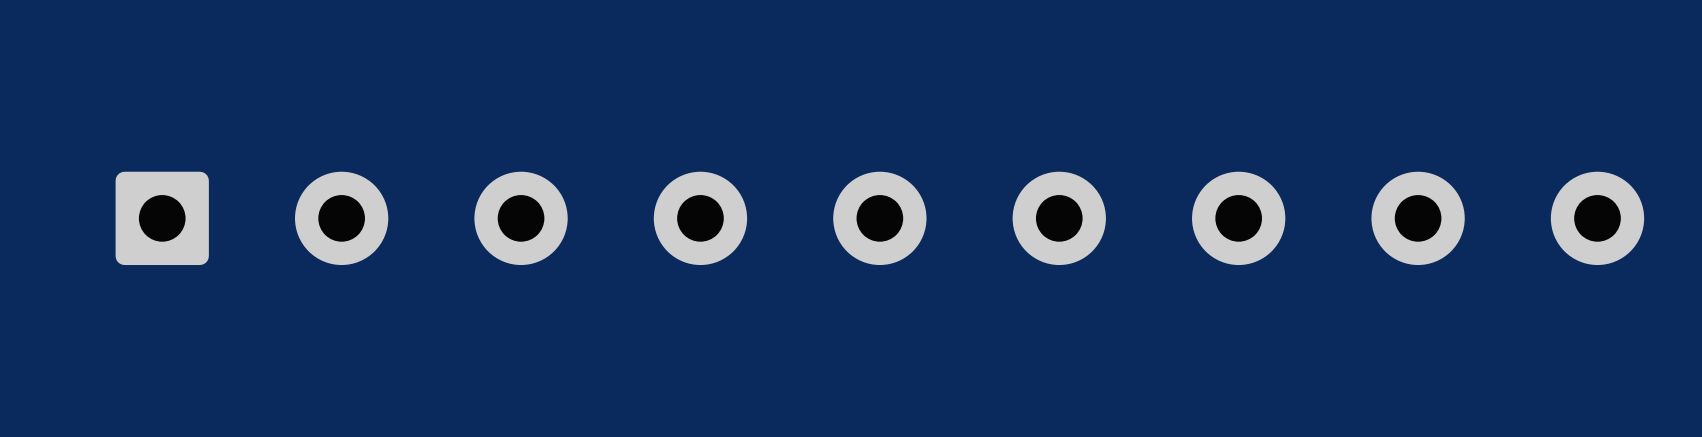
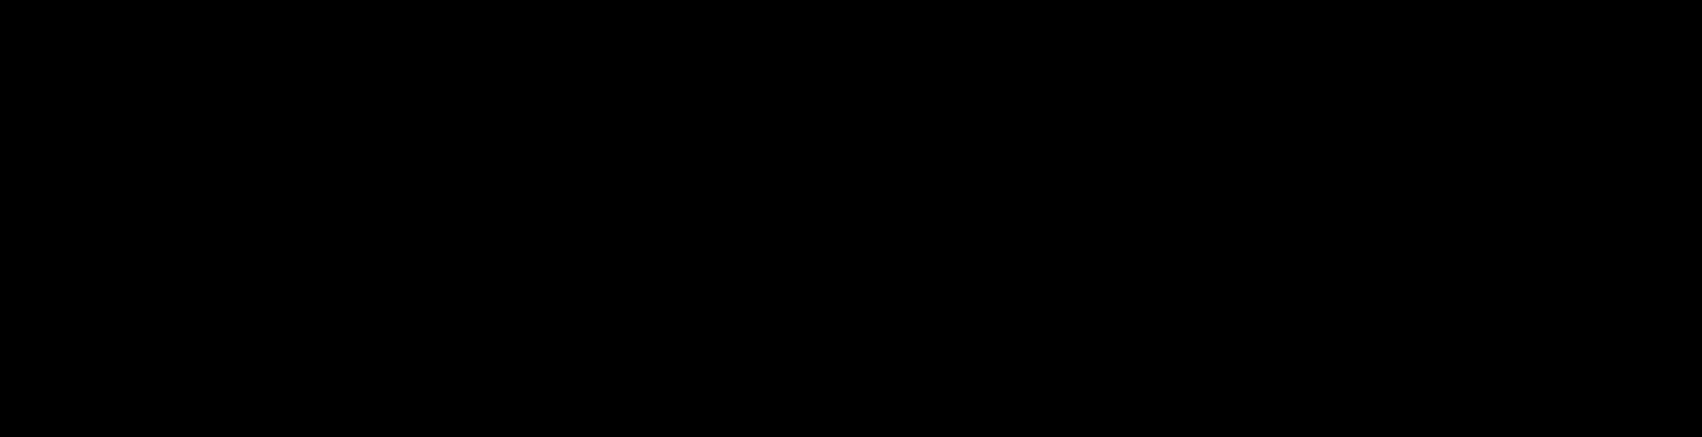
part: (879, 218) -> none

